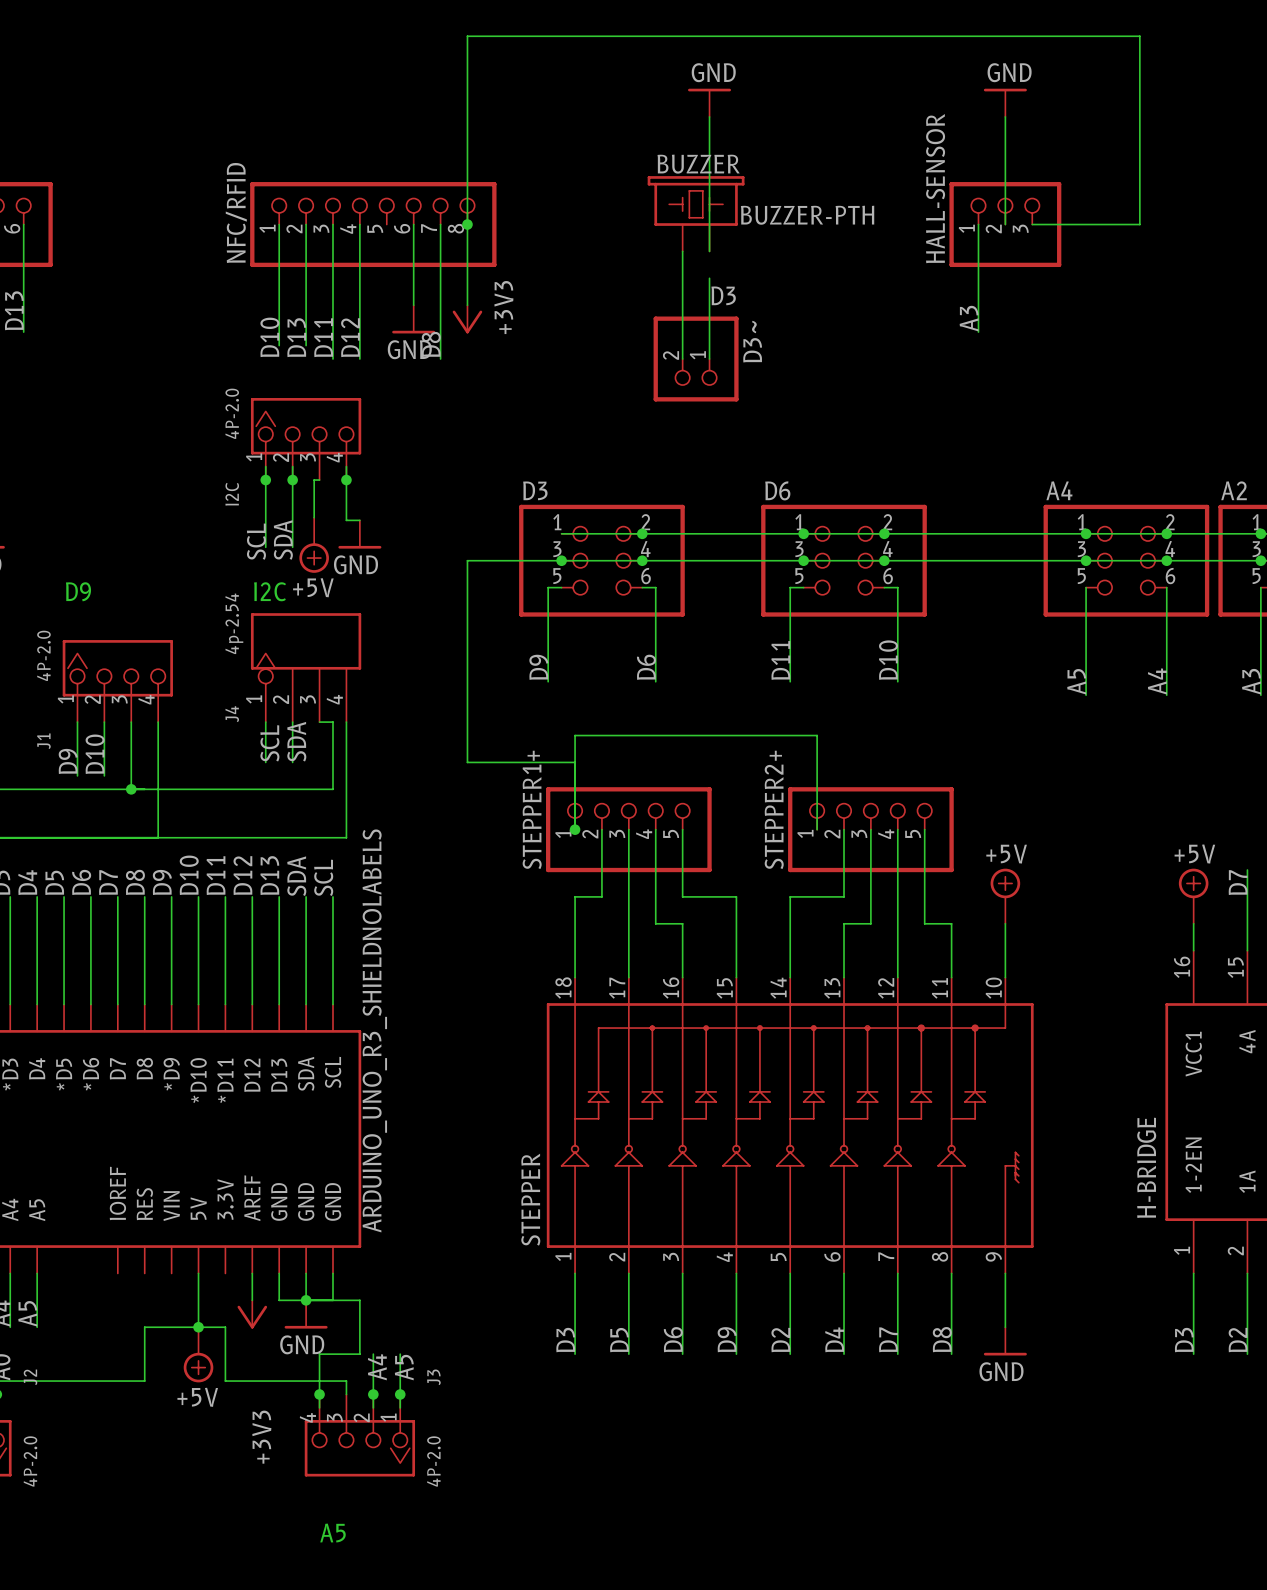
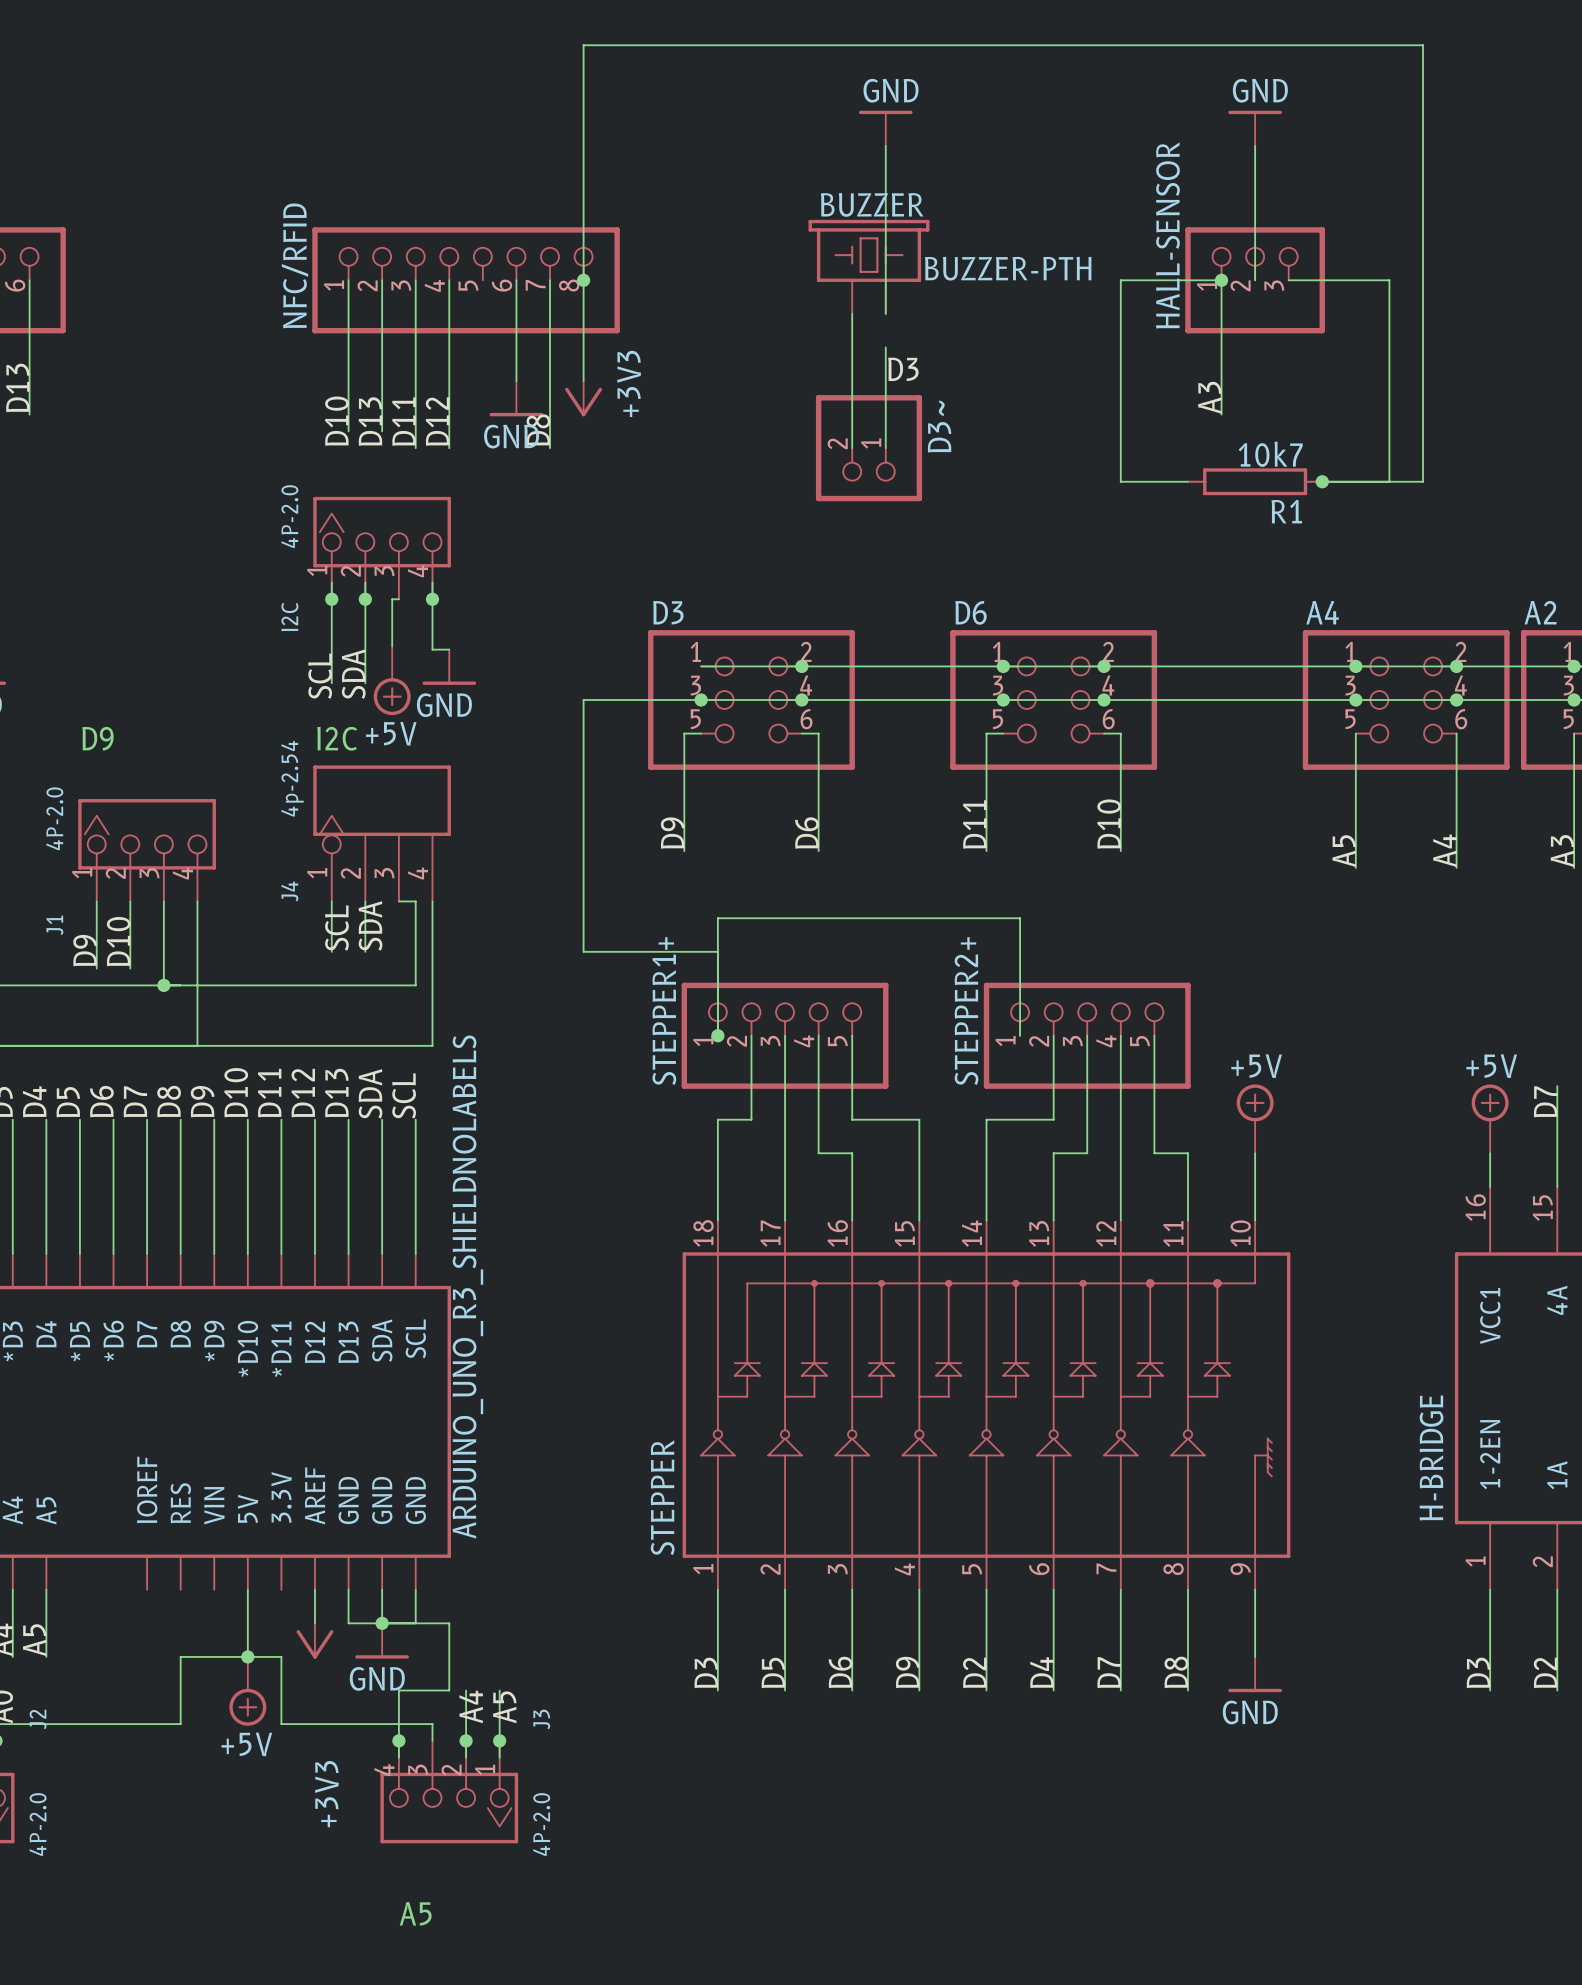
wire: none -> (1221, 280) (1120, 280) (1120, 481) (1187, 481)
junction: none -> (1221, 280)
wire: (1112, 224) (1139, 224) -> (1389, 280) (1389, 481)
wire: none -> (1423, 280) (1423, 481) (1322, 481)
R1: none -> 10k7 (1255, 481)
junction: none -> (1322, 481)

